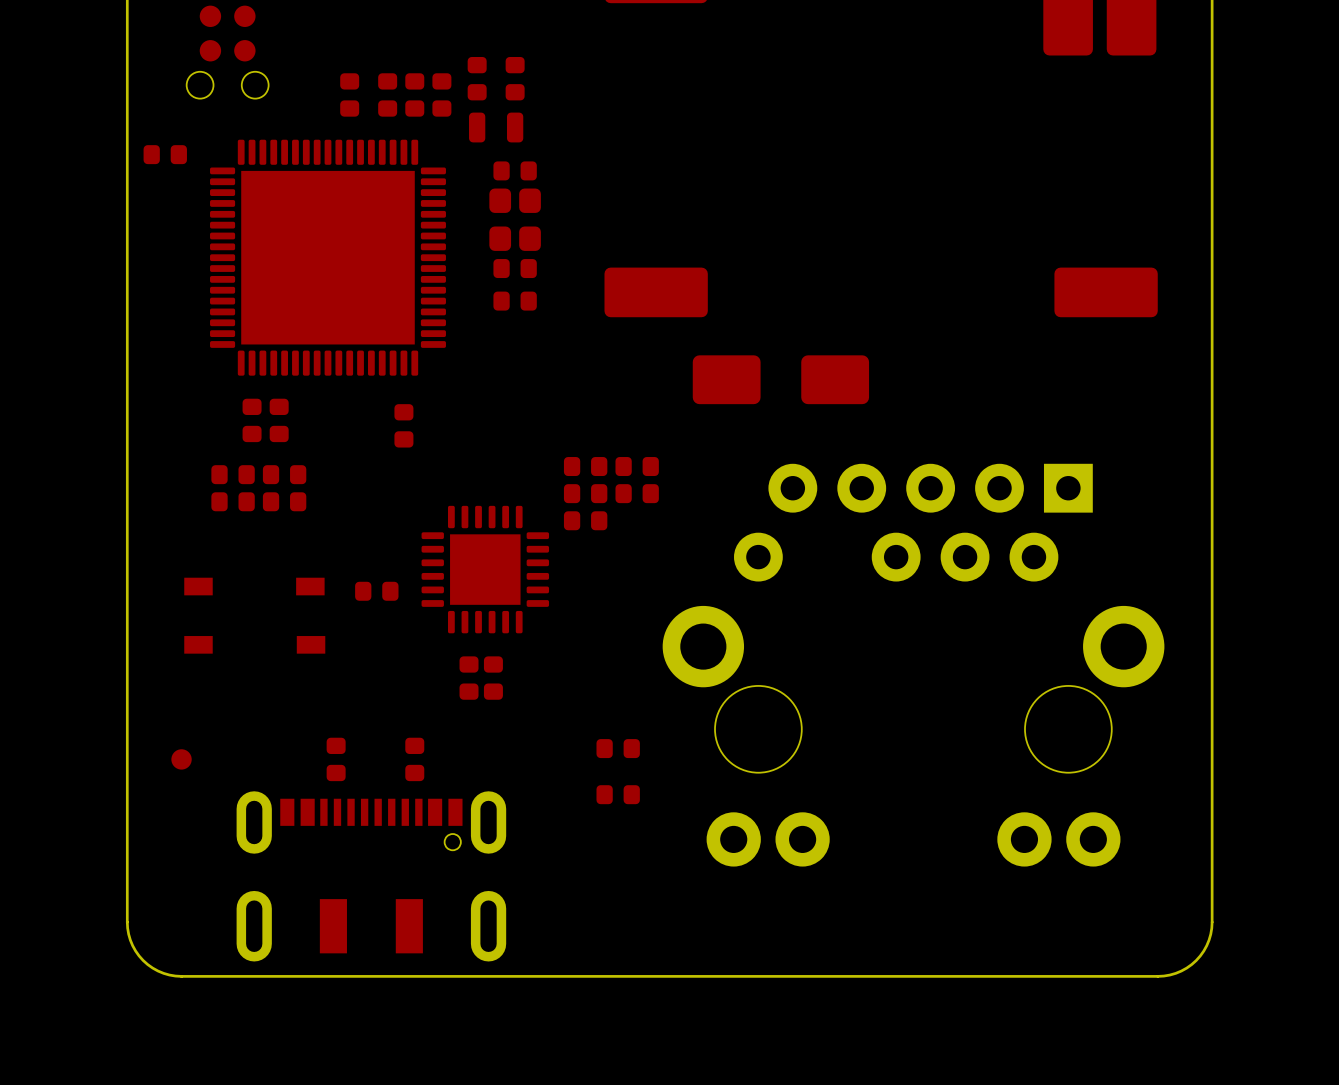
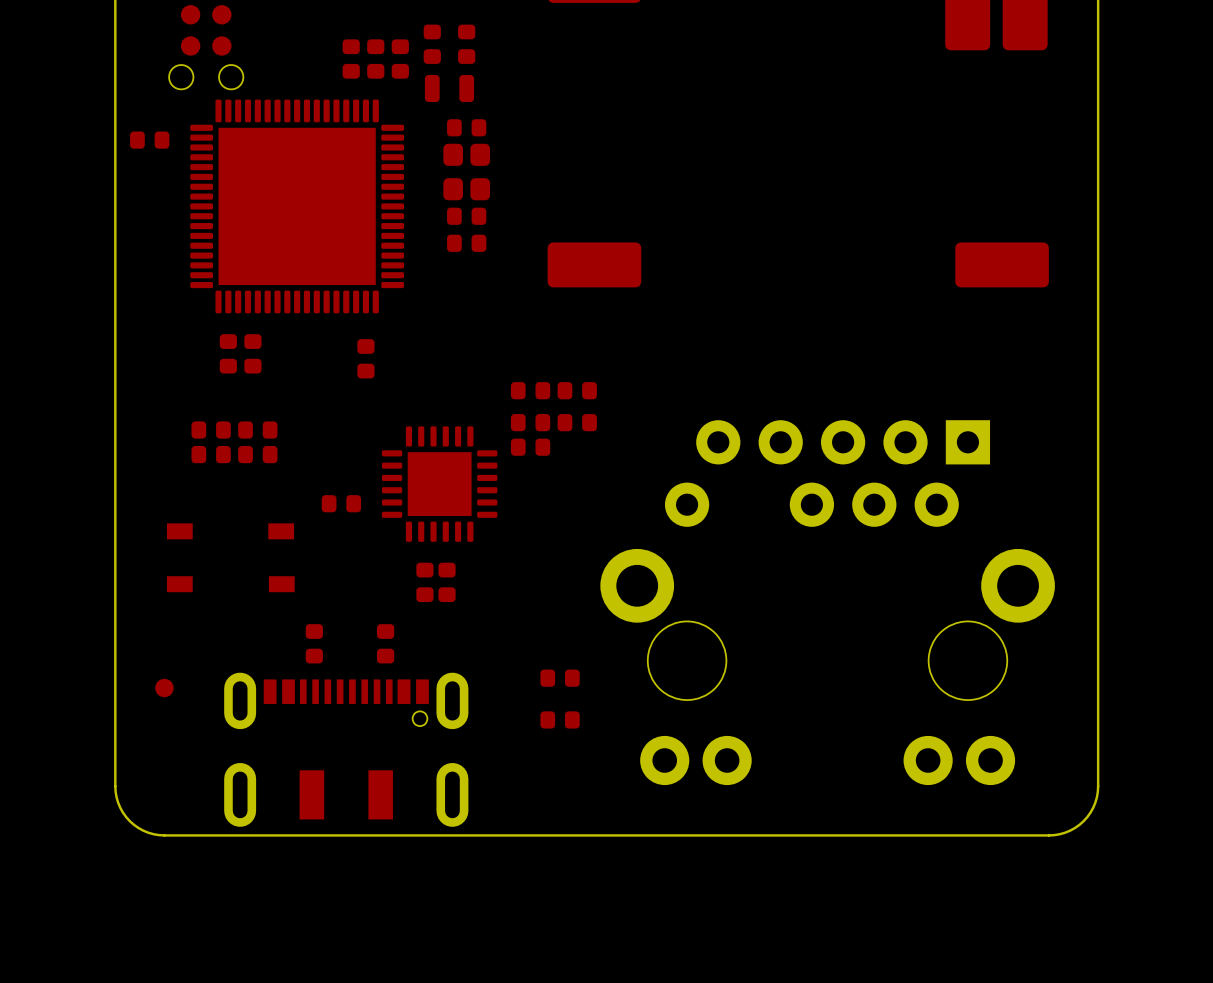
part: none -> (432, 44)
part: none -> (466, 44)
part: none -> (351, 59)
part: none -> (375, 59)
part: none -> (400, 59)
part: (477, 78) -> none
part: (515, 78) -> none
part: (349, 94) -> none
part: (387, 94) -> none
part: (414, 94) -> none
part: (441, 94) -> none
part position: (496, 127) -> (449, 88)
part position: (515, 170) -> (466, 127)
part position: (515, 219) -> (466, 172)
part: none -> (466, 216)
part position: (327, 257) -> (297, 206)
part: (515, 301) -> none
part: (780, 379) -> none
part: none -> (228, 353)
part: none -> (252, 353)
part: (252, 420) -> none
part: (279, 420) -> none
part position: (403, 425) -> (365, 358)
part: none -> (530, 390)
part: none -> (577, 390)
part: (637, 493) -> none
part: (585, 520) -> none
part position: (485, 569) -> (439, 484)
part position: (376, 591) -> (341, 503)
part: none -> (424, 582)
part: none -> (447, 582)
part: (469, 678) -> none
part: (493, 678) -> none
part: none -> (314, 643)
part: none -> (385, 643)
part: (336, 759) -> none
part: (414, 759) -> none
board edge: (1212, 867) (1211, 928) (1206, 945) (1196, 960) (1186, 968) (1169, 975) (1157, 976) (175, 976) (163, 973) (147, 964) (132, 945) (127, 928) (127, 867) -> (1098, 786) (1093, 807) (1083, 821) (1070, 830) (1049, 835) (164, 835) (143, 830) (129, 821) (118, 802) (115, 786)
part position: (371, 876) -> (346, 749)

